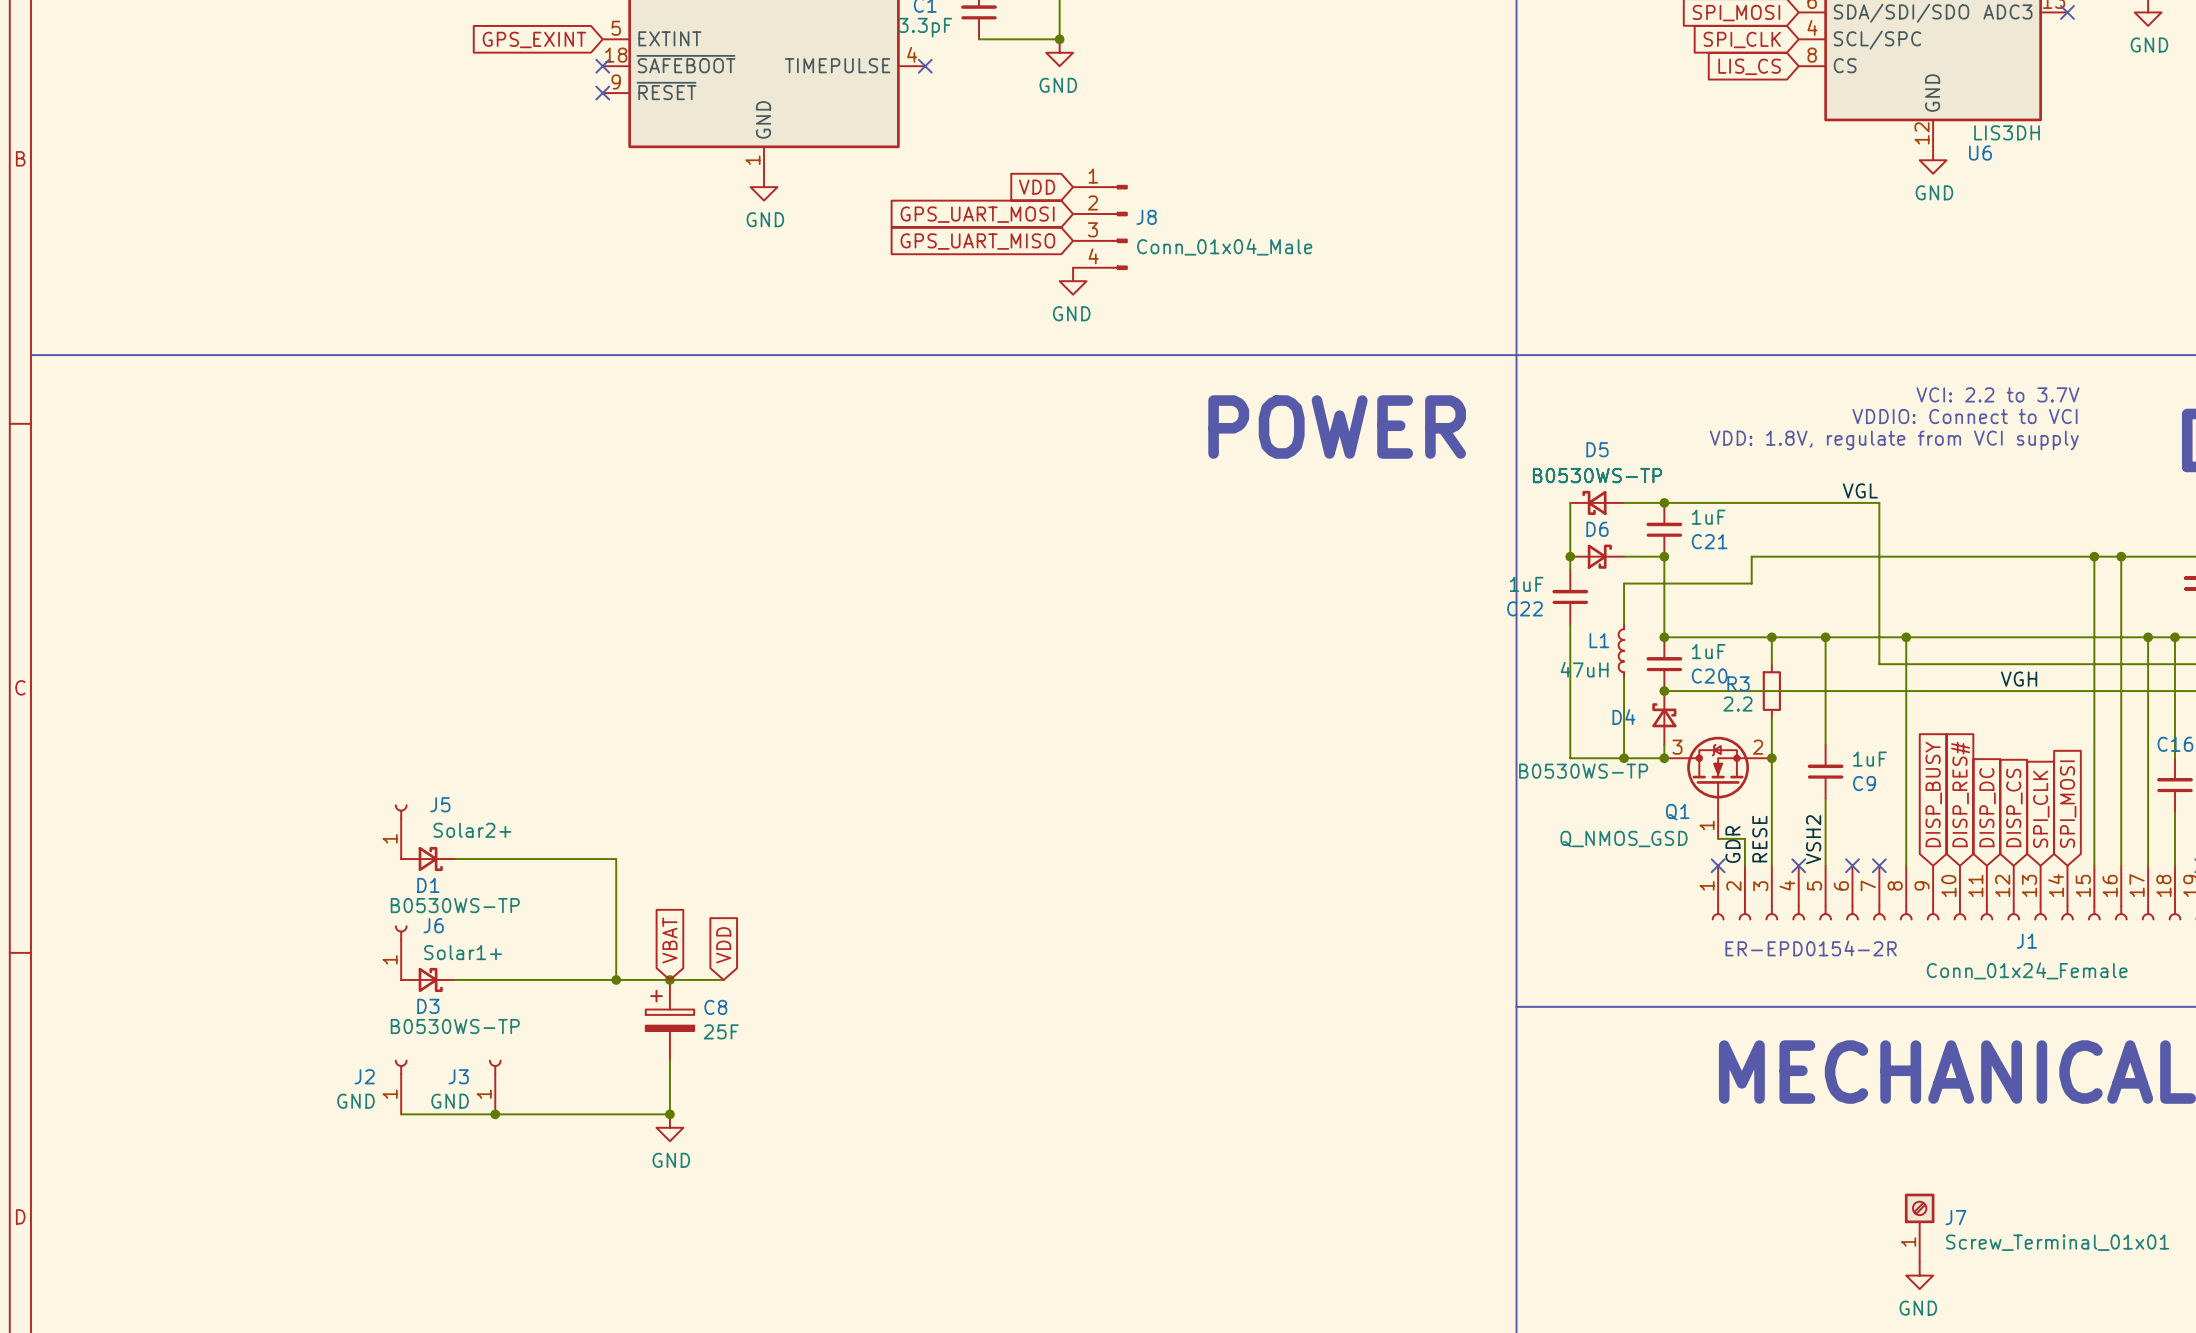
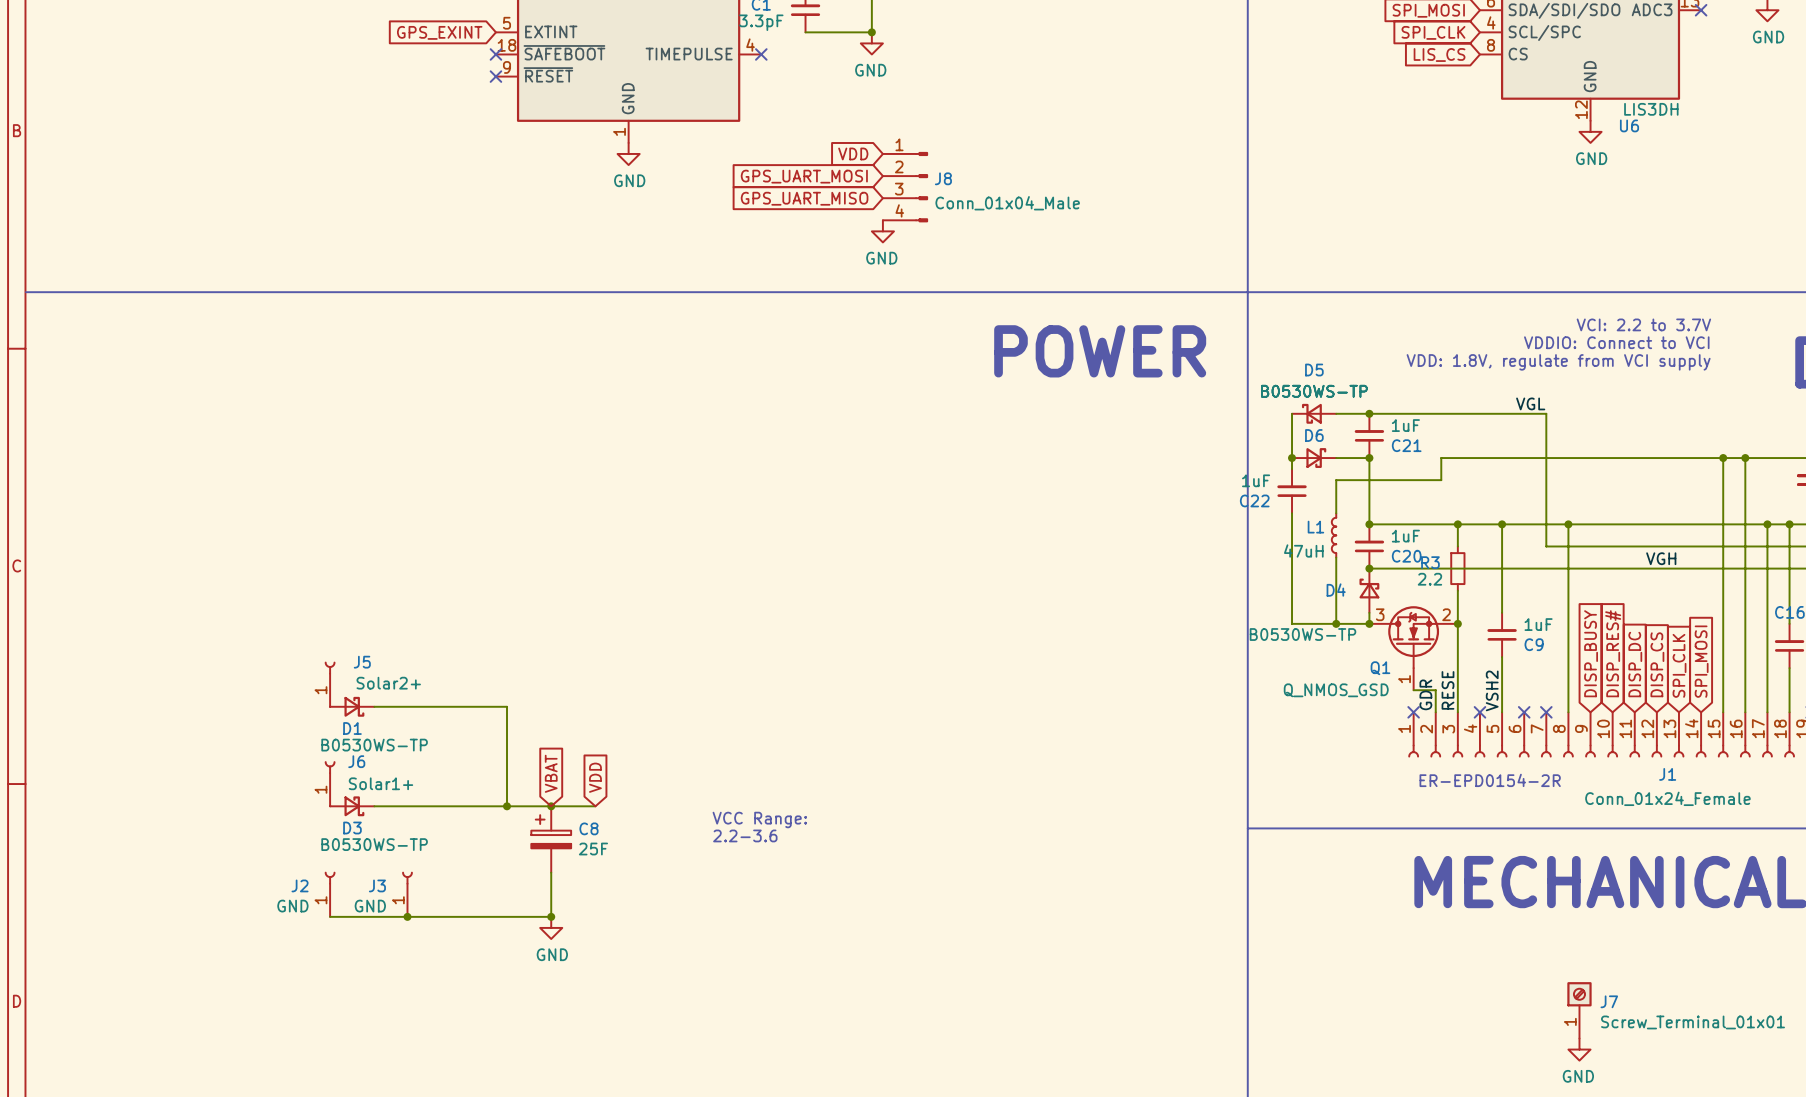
text: none -> VCC Range: (759, 819)
text: none -> 2.2-3.6 (745, 835)

